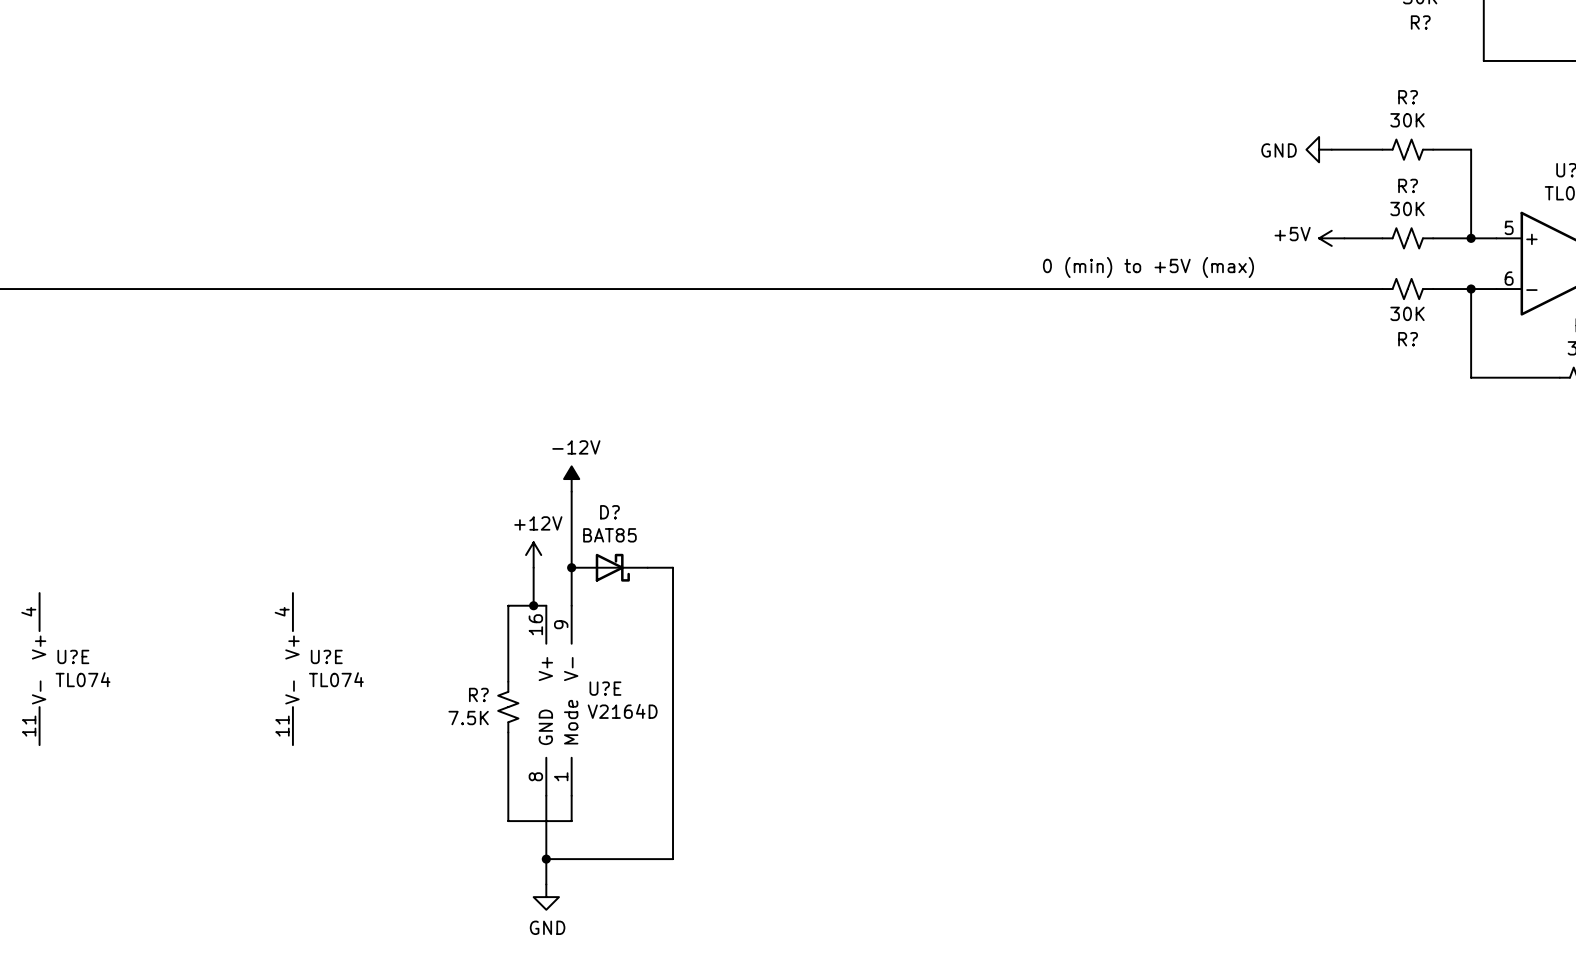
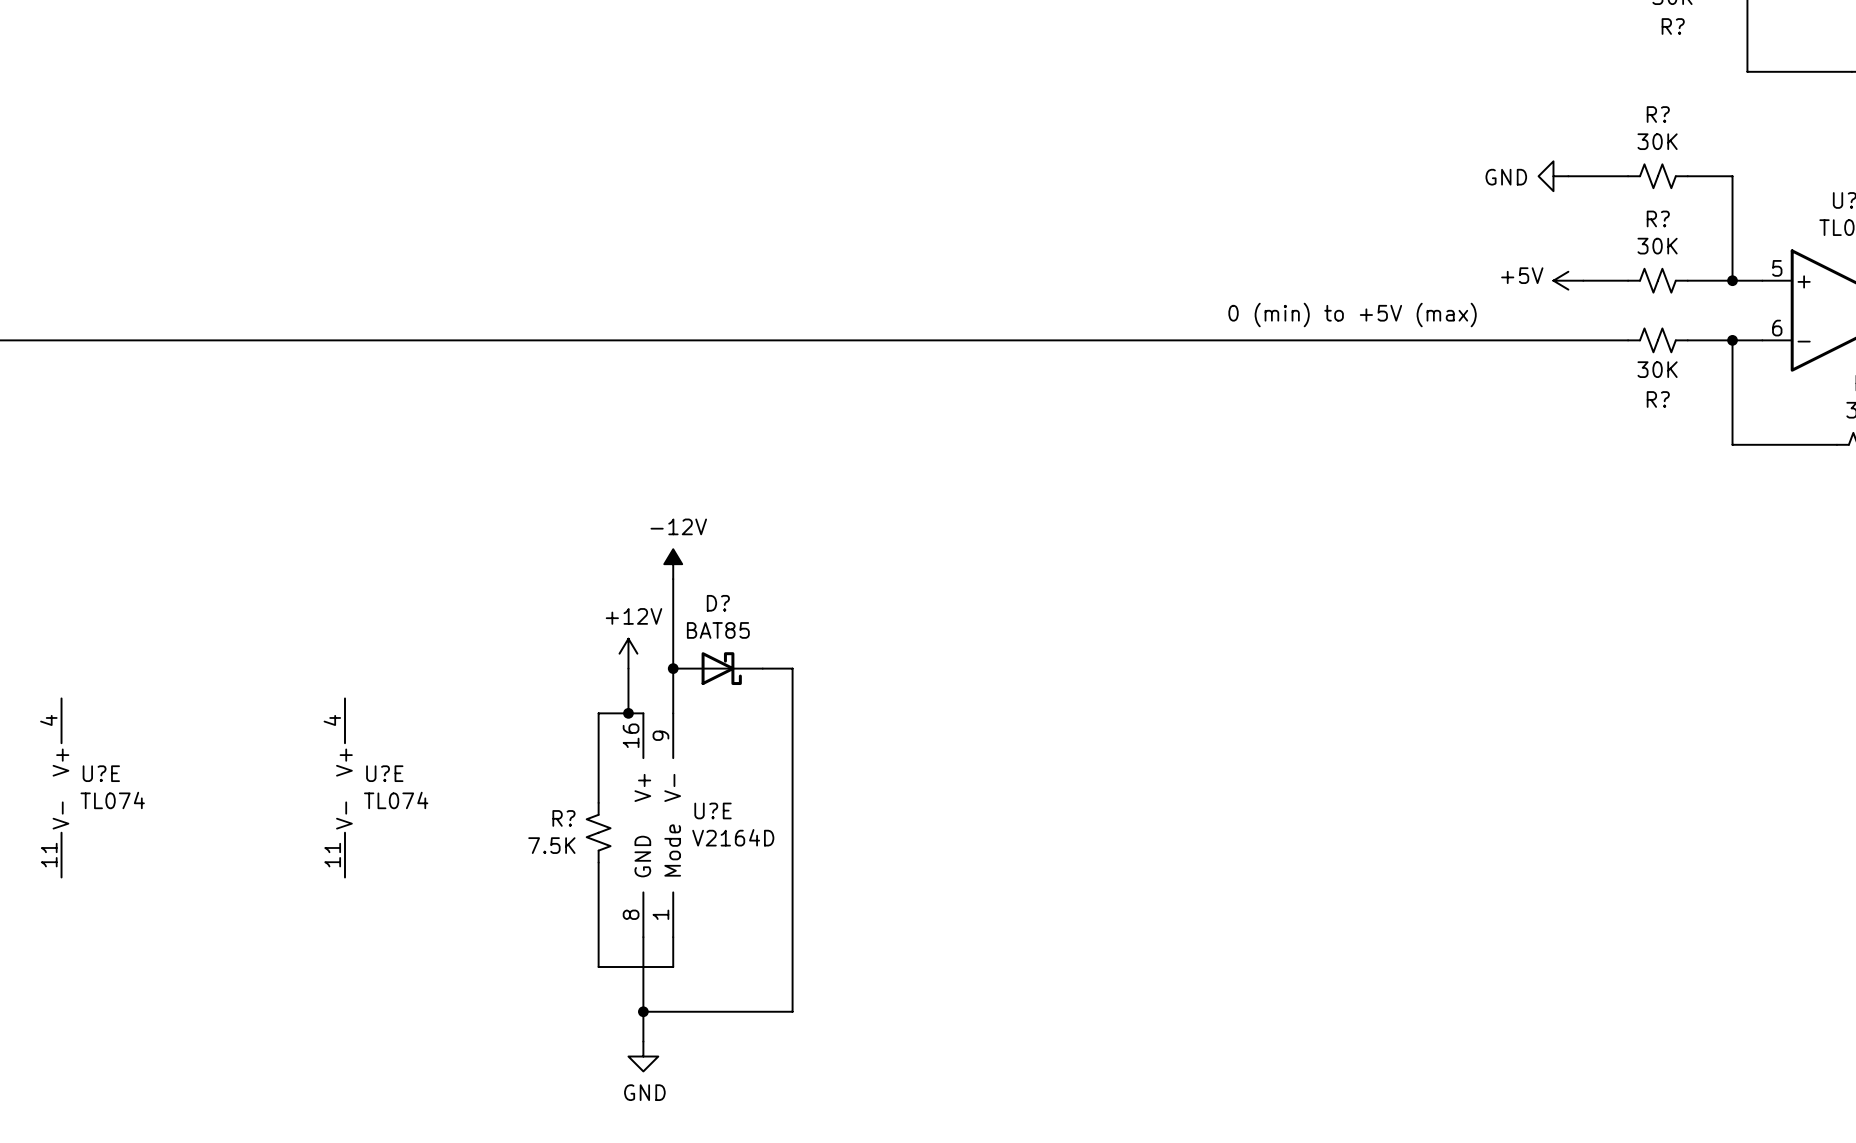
U?E position: (39, 669) -> (61, 787)

